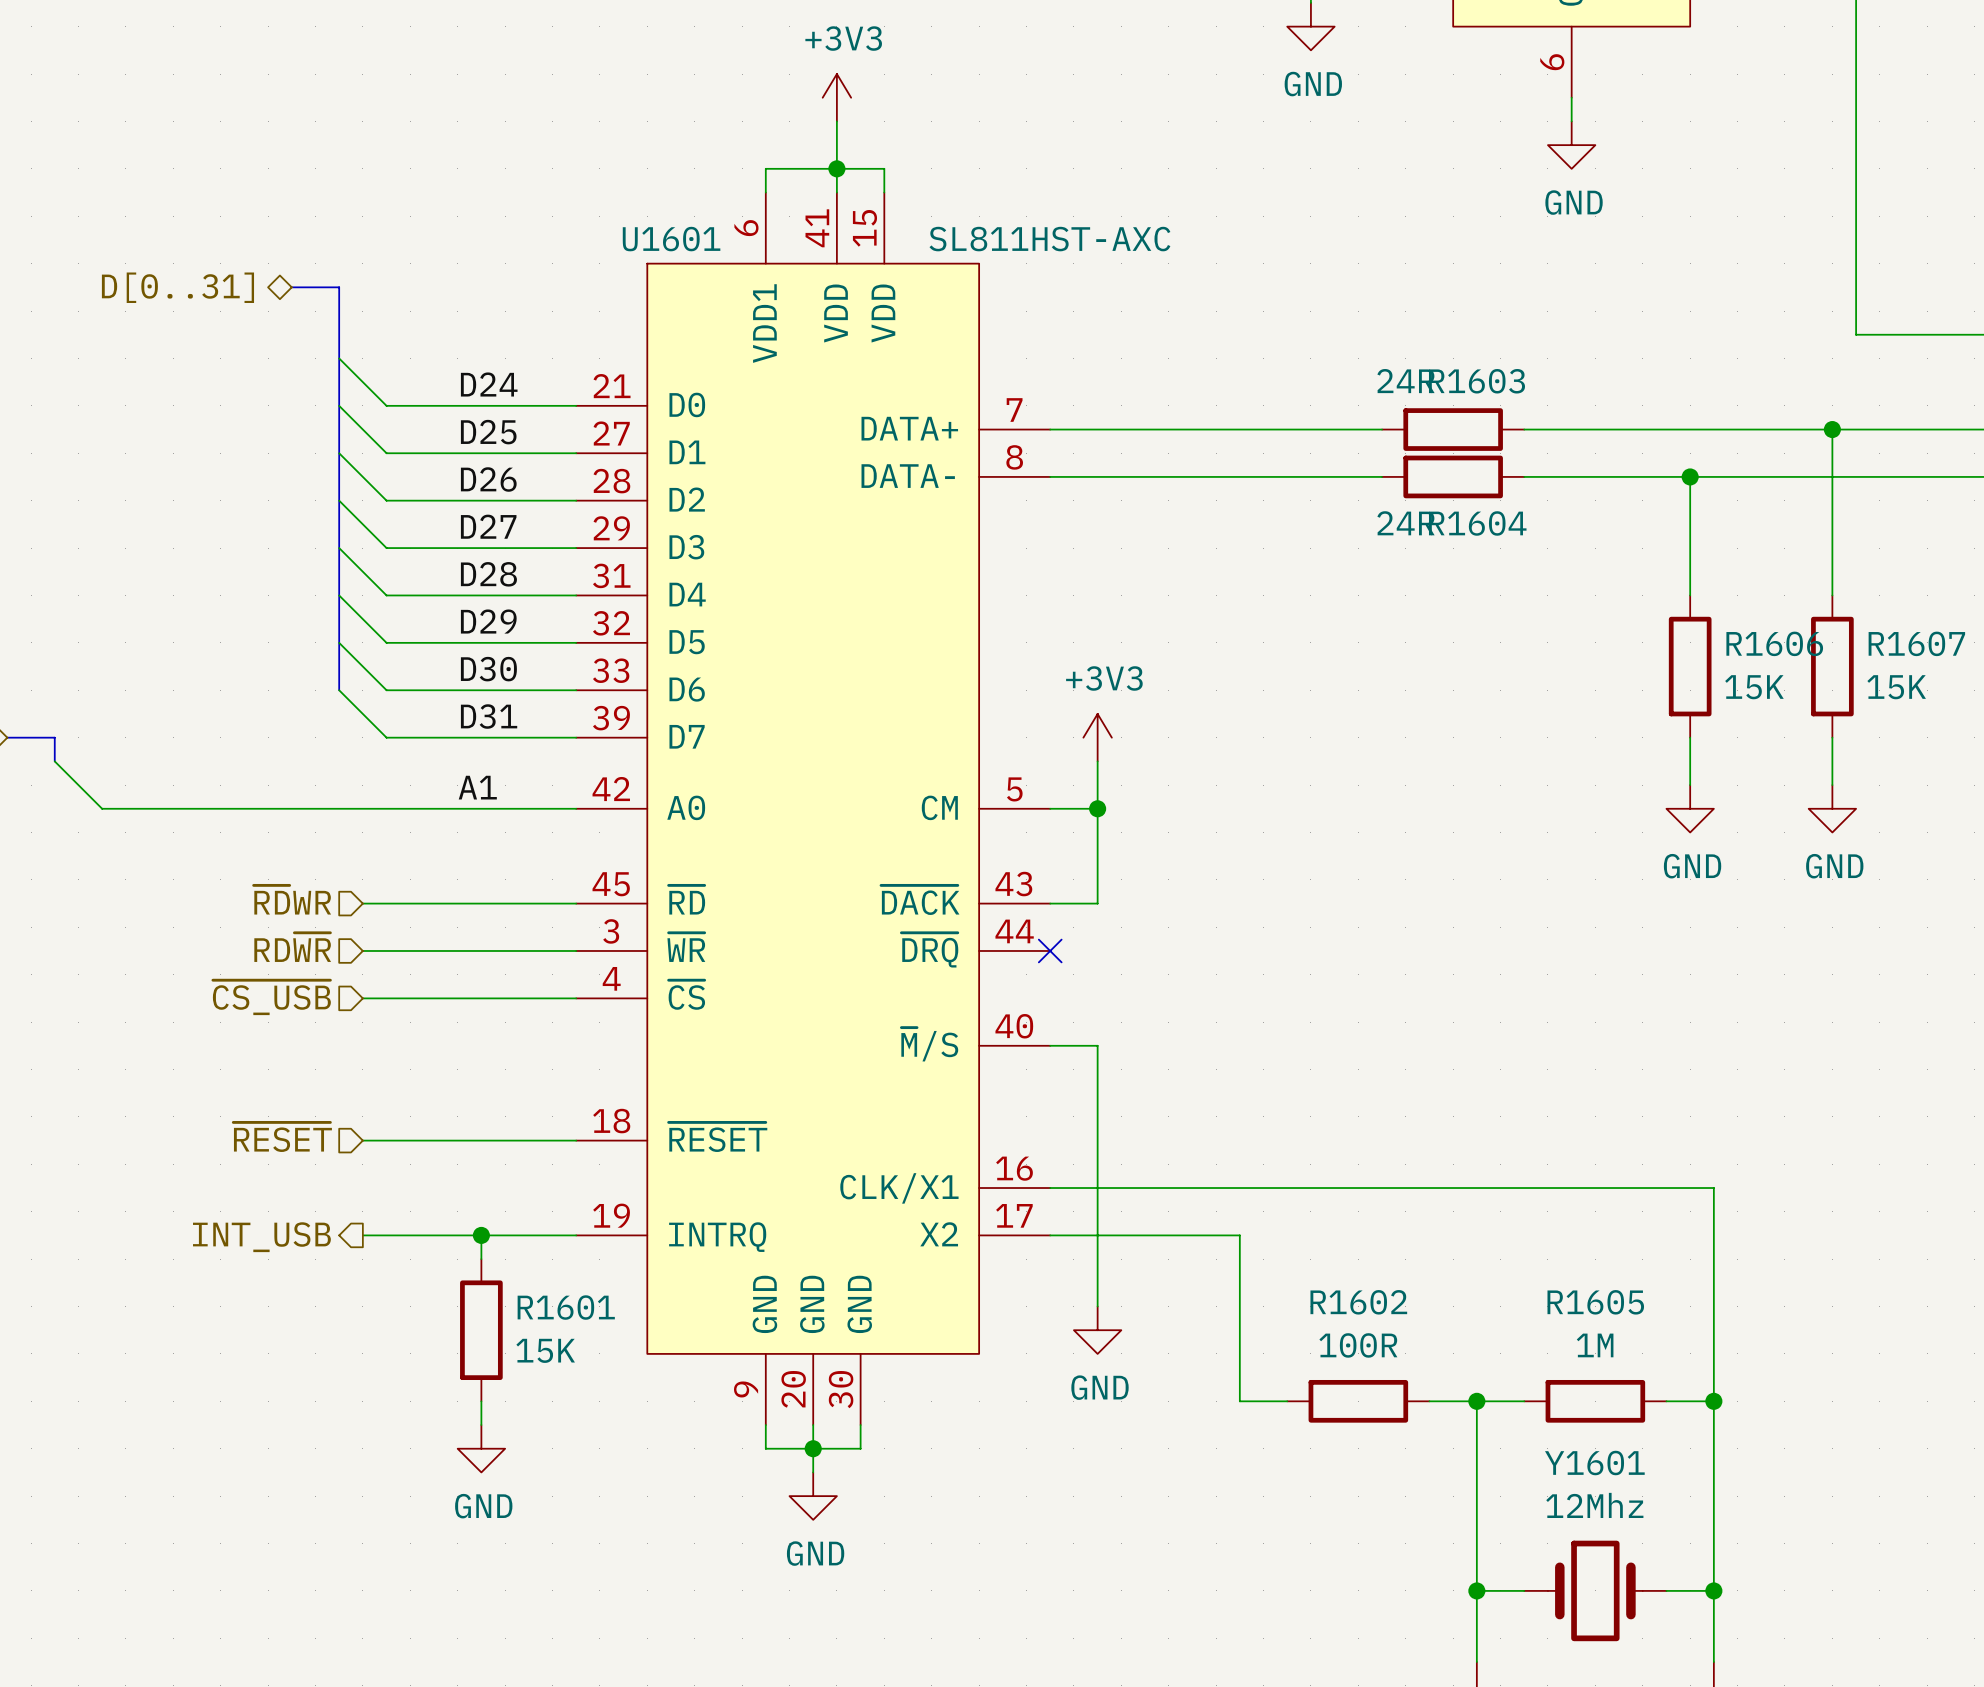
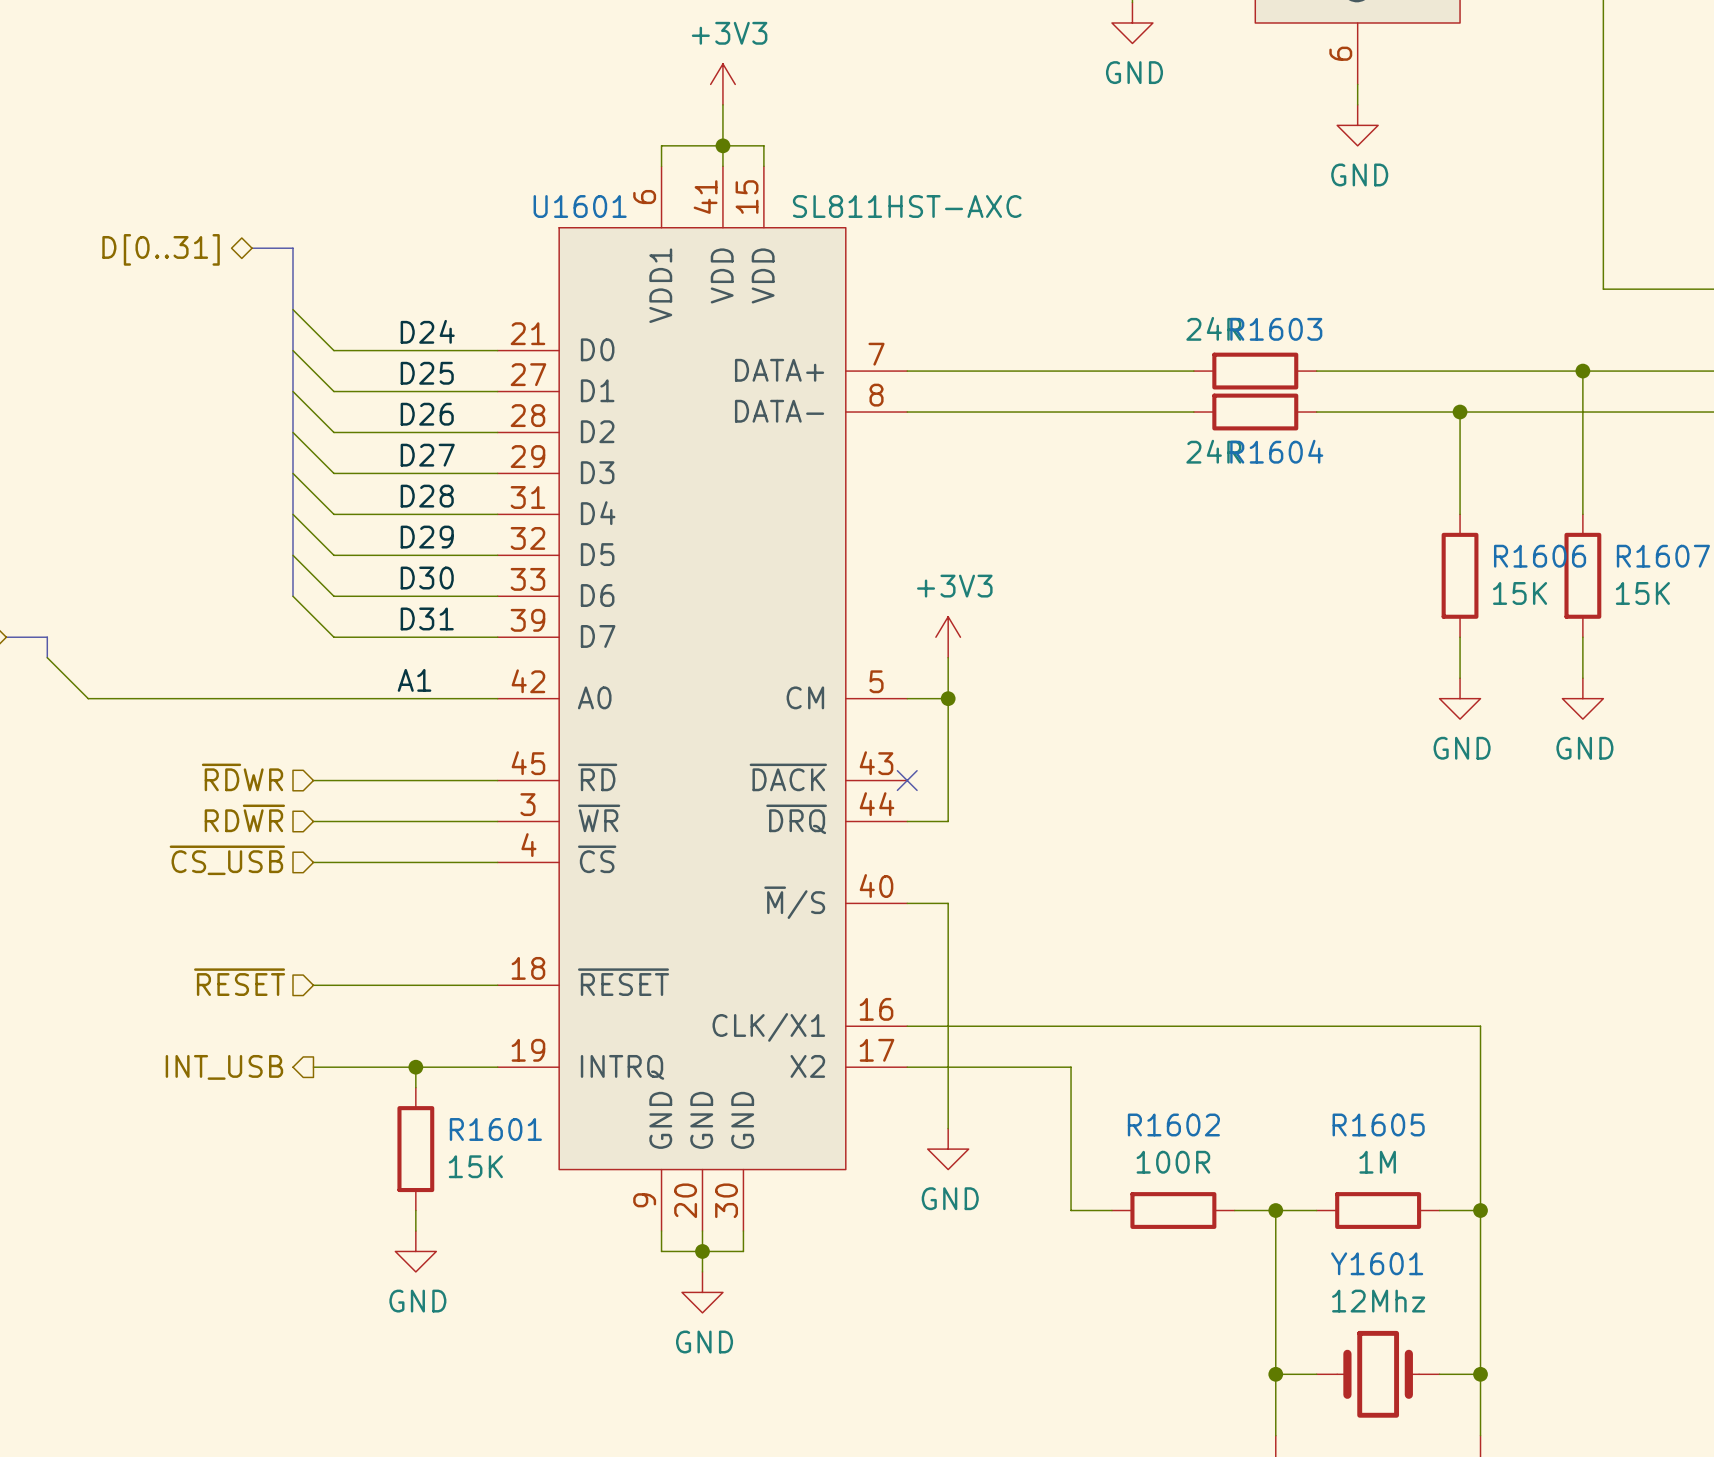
wire: (1050, 903) (1097, 903) -> (907, 821) (948, 821) (948, 780)
no-connect mark position: (1050, 950) -> (907, 780)

